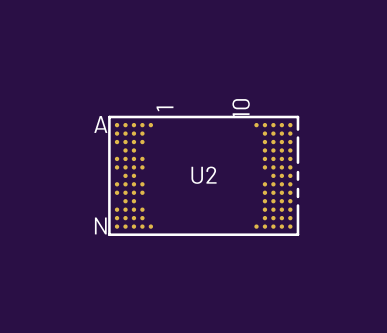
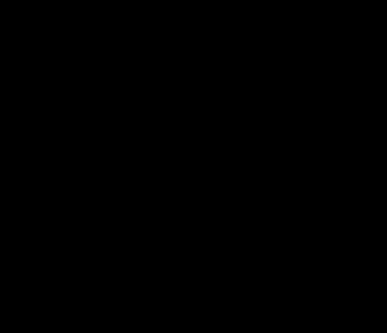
U2: (203, 175) -> none

